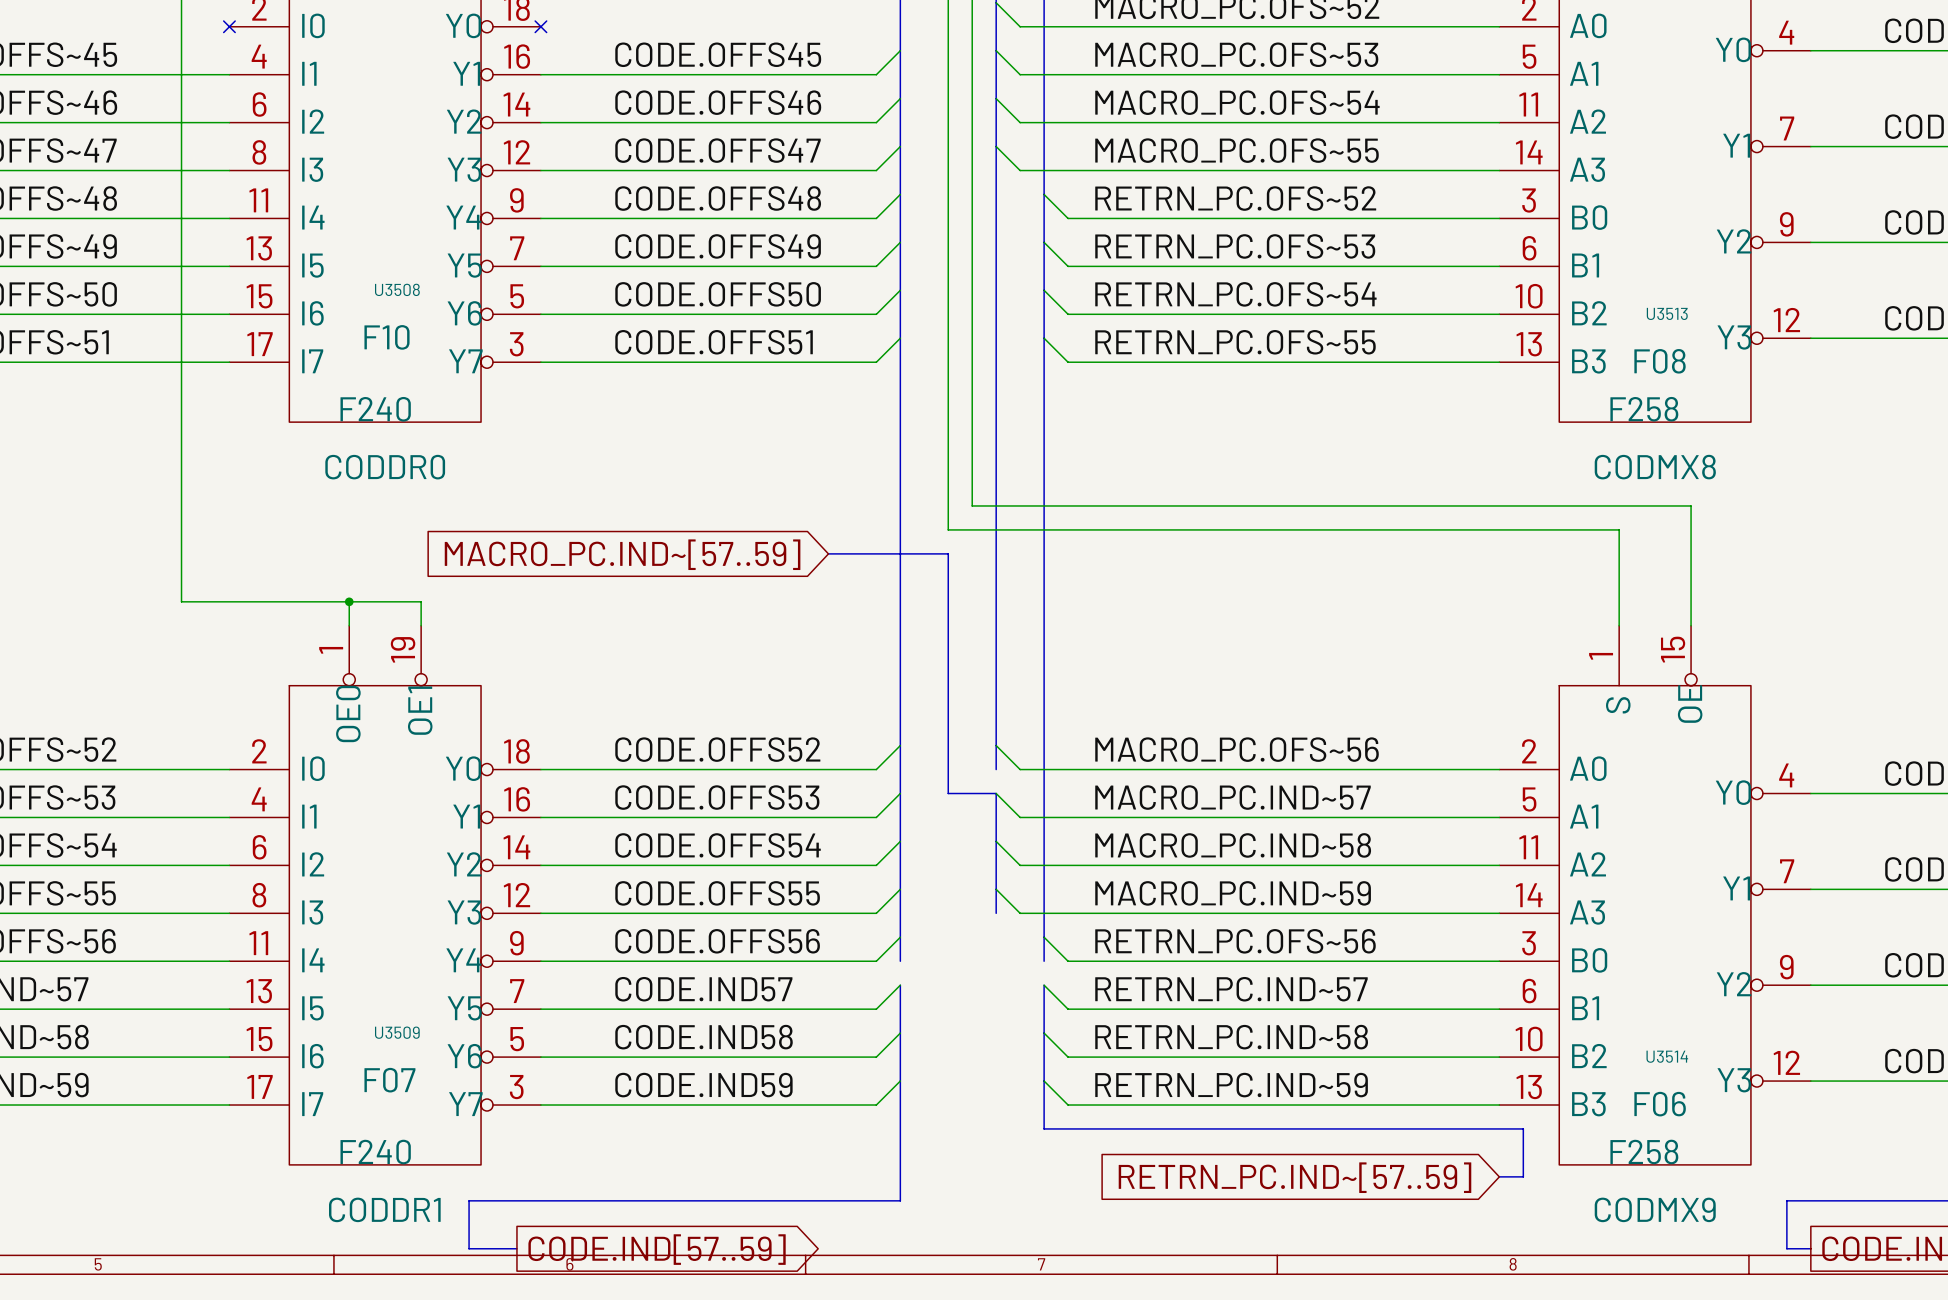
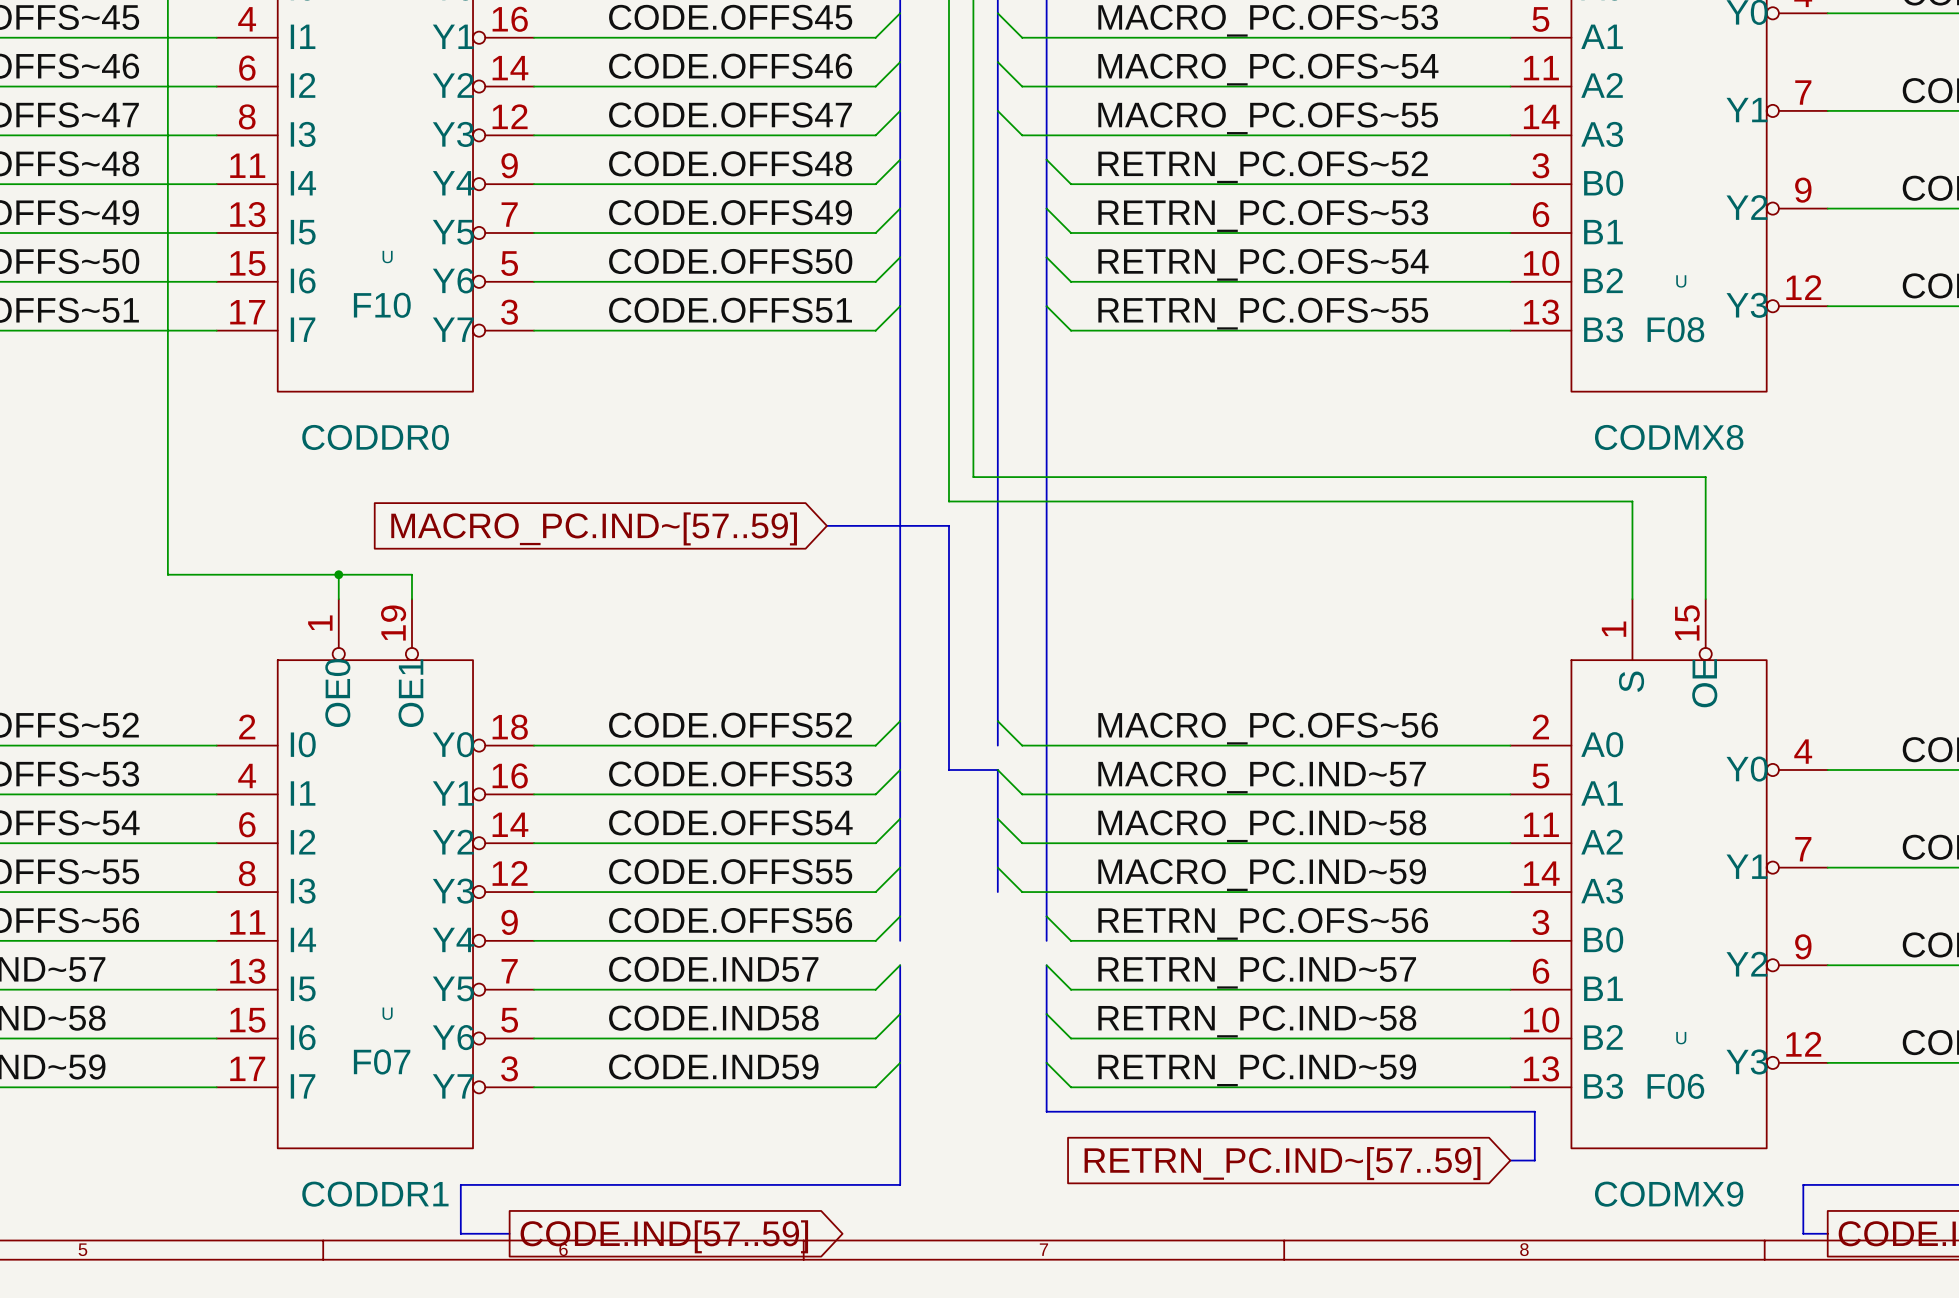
U3508 name: U3508 (397, 289) -> U (387, 257)
U3513 name: U3513 (1667, 313) -> U (1681, 281)
U3508 value: F240 (375, 409) -> none
U3513 value: F258 (1644, 409) -> none
U3509 name: U3509 (397, 1032) -> U (387, 1013)
U3514 name: U3514 (1667, 1056) -> U (1681, 1038)
U3514 value: F258 (1644, 1151) -> none
U3509 value: F240 (375, 1152) -> none

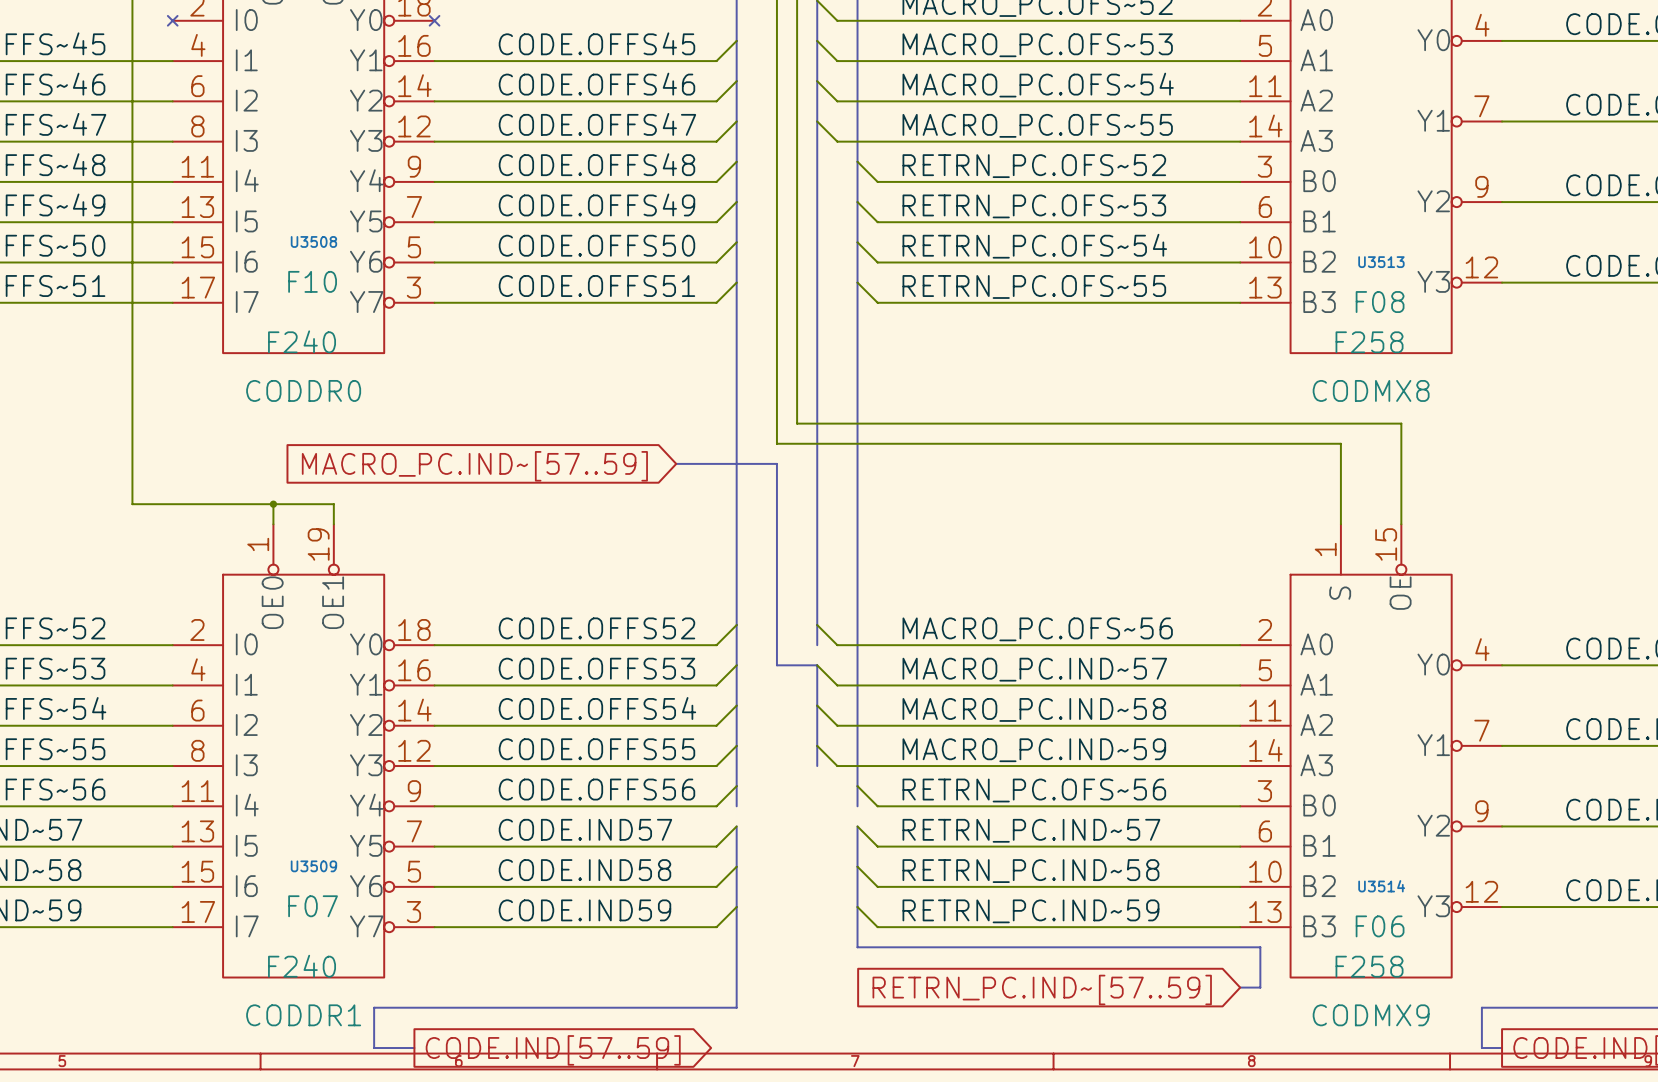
U name: U (387, 257) -> U3508 (313, 241)
U name: U (1681, 281) -> U3513 (1381, 262)
U value: none -> F240 (302, 341)
U value: none -> F258 (1369, 342)
U name: U (387, 1013) -> U3509 (313, 866)
U name: U (1681, 1038) -> U3514 (1381, 886)
U value: none -> F240 (302, 966)
U value: none -> F258 (1369, 966)

